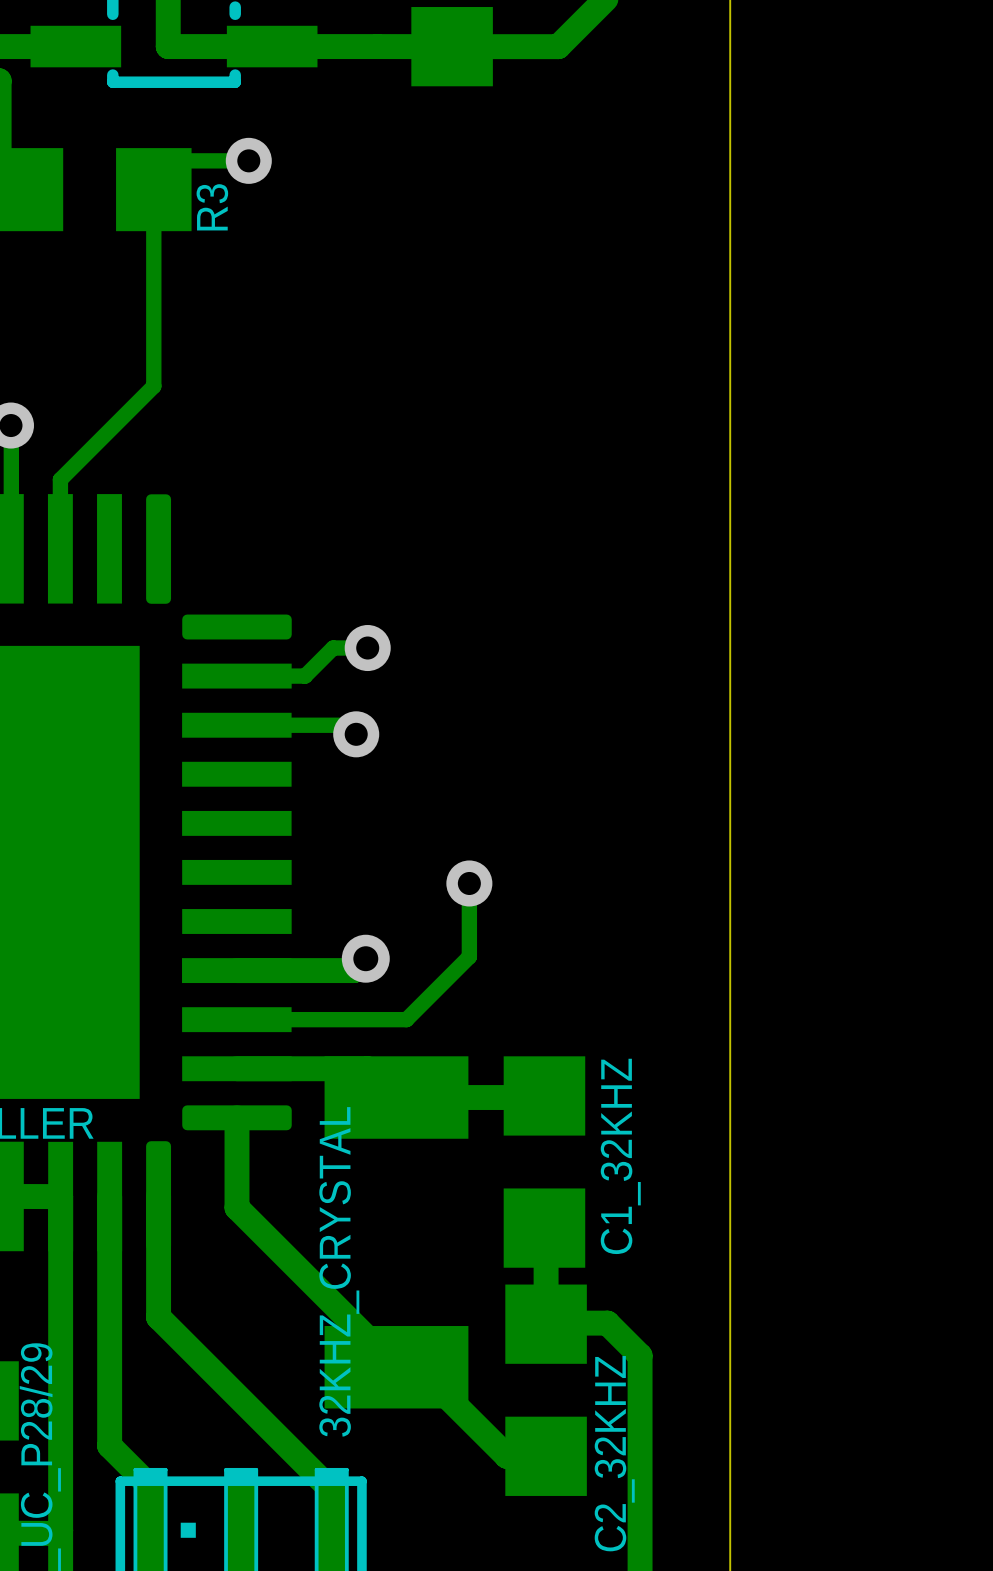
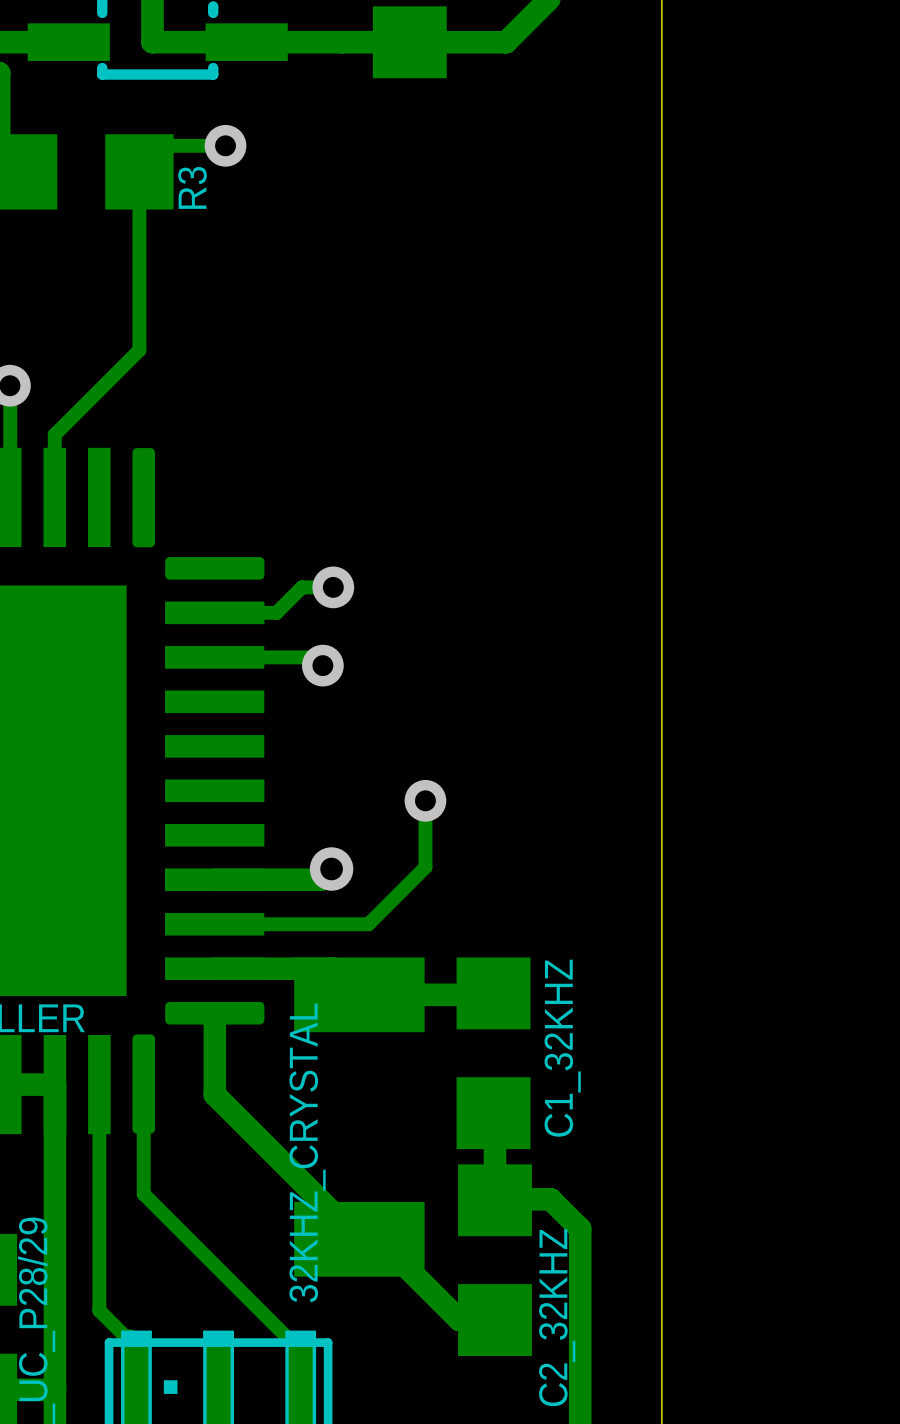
track width: thick (158, 1195) (158, 1317) (330, 1489) (331, 1530) -> thin (143, 1084) (143, 1194) (299, 1350) (300, 1387)
track width: thick (109, 1196) (109, 1445) (142, 1479) -> thin (99, 1084) (99, 1310) (129, 1340)

